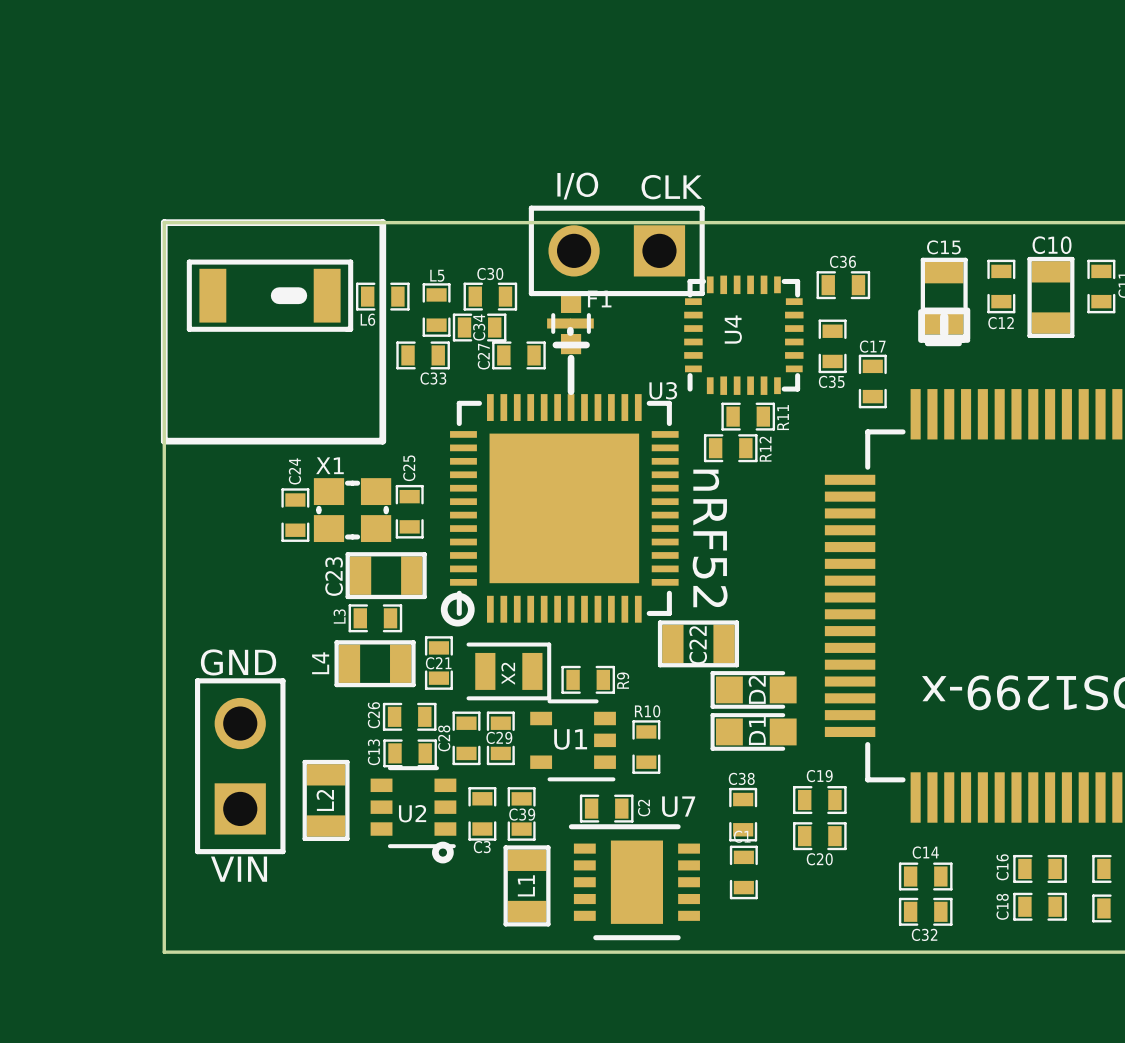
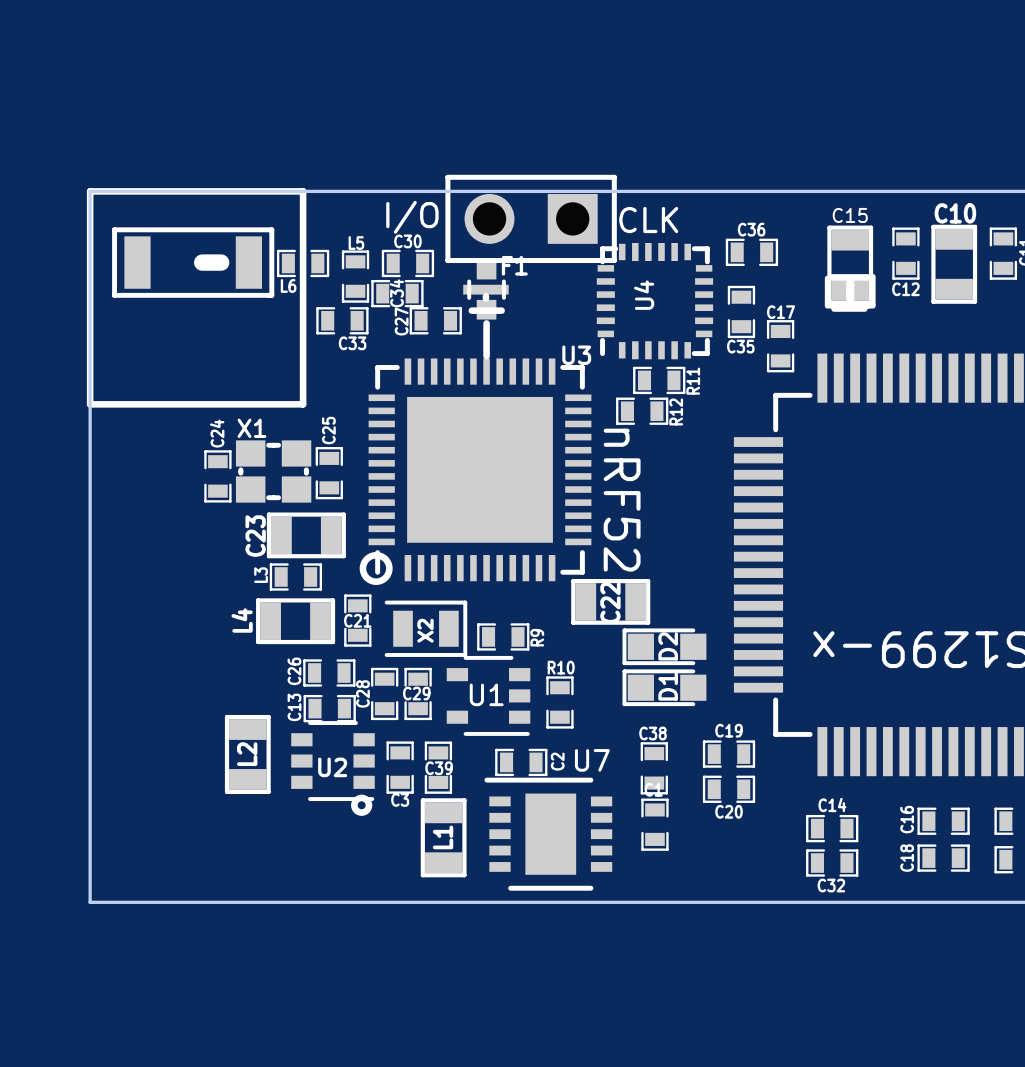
text position: I/O (577, 186) -> I/O (412, 217)
text position: CLK (671, 187) -> CLK (648, 220)
text: GND (238, 662) -> none
part: (240, 766) -> none
text: VIN (239, 869) -> none

